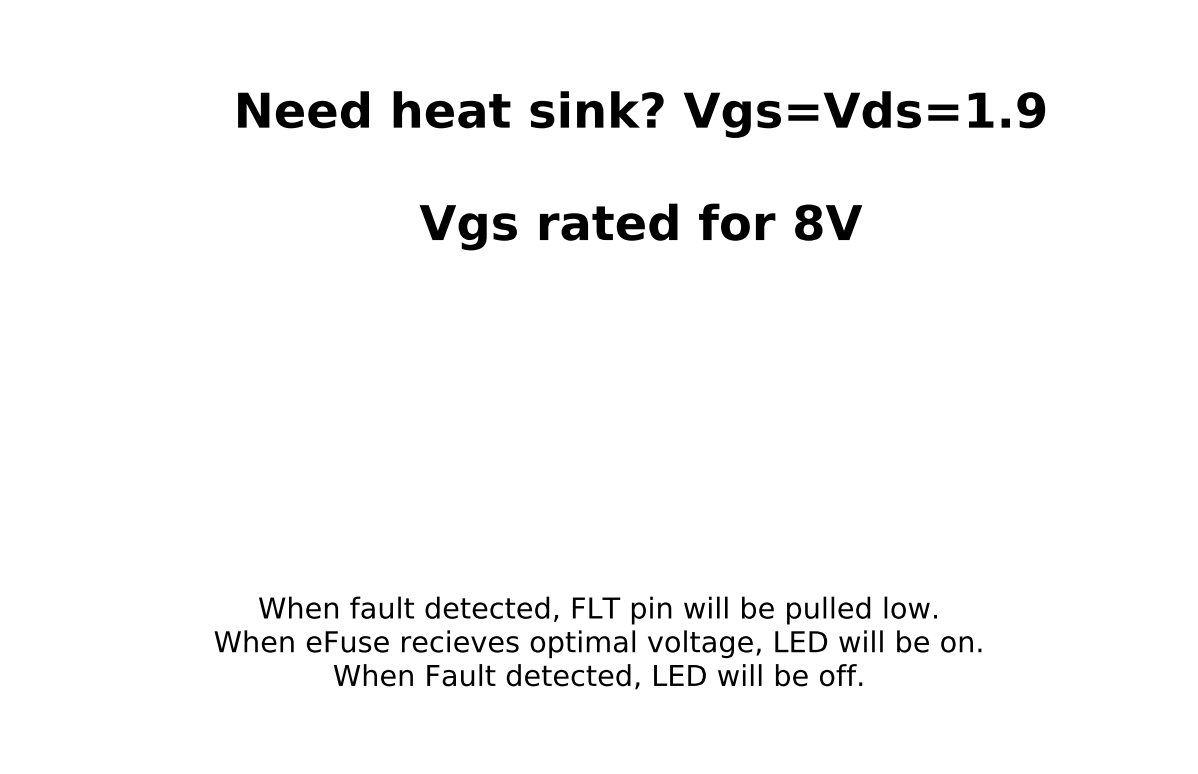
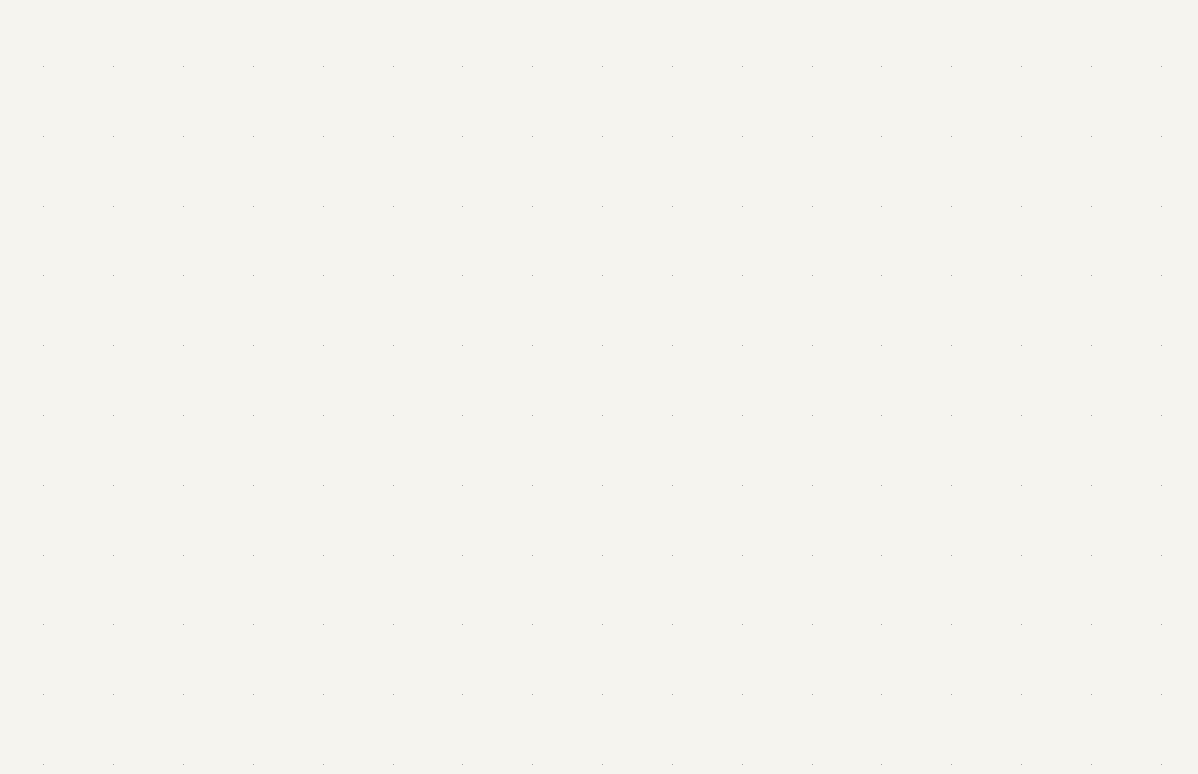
text: Need heat sink? Vgs=Vds=1.9 (641, 114) -> none
text: Vgs rated for 8V (640, 227) -> none
text: When fault detected, FLT pin will be pulled low. (597, 610) -> none
text: When eFuse recieves optimal voltage, LED will be on. (597, 644) -> none
text: When Fault detected, LED will be off. (597, 676) -> none

